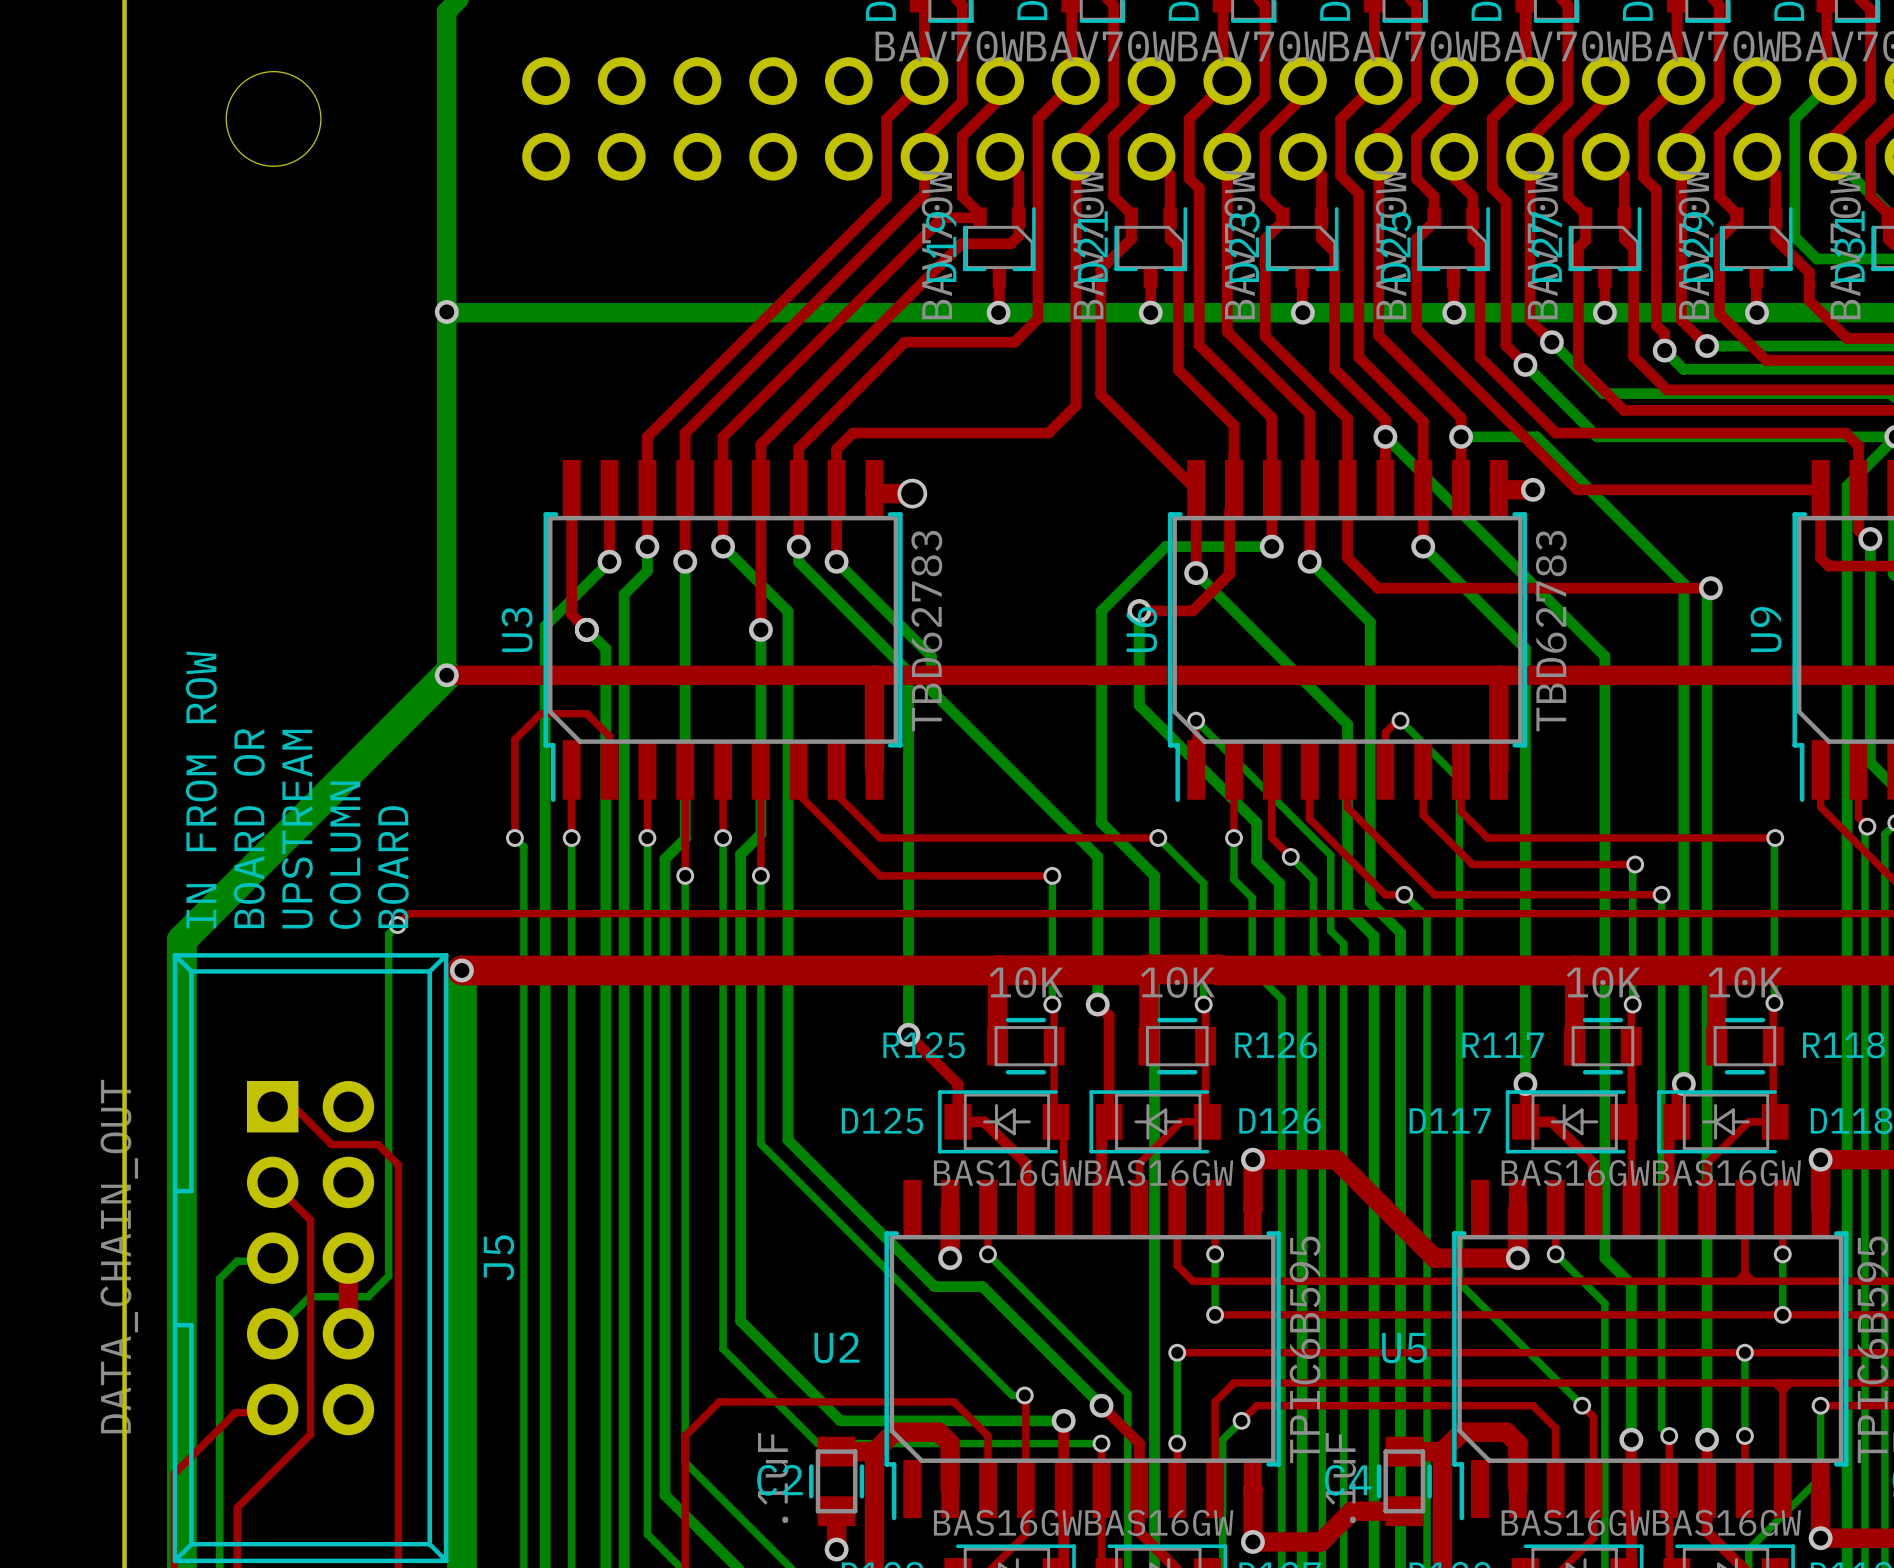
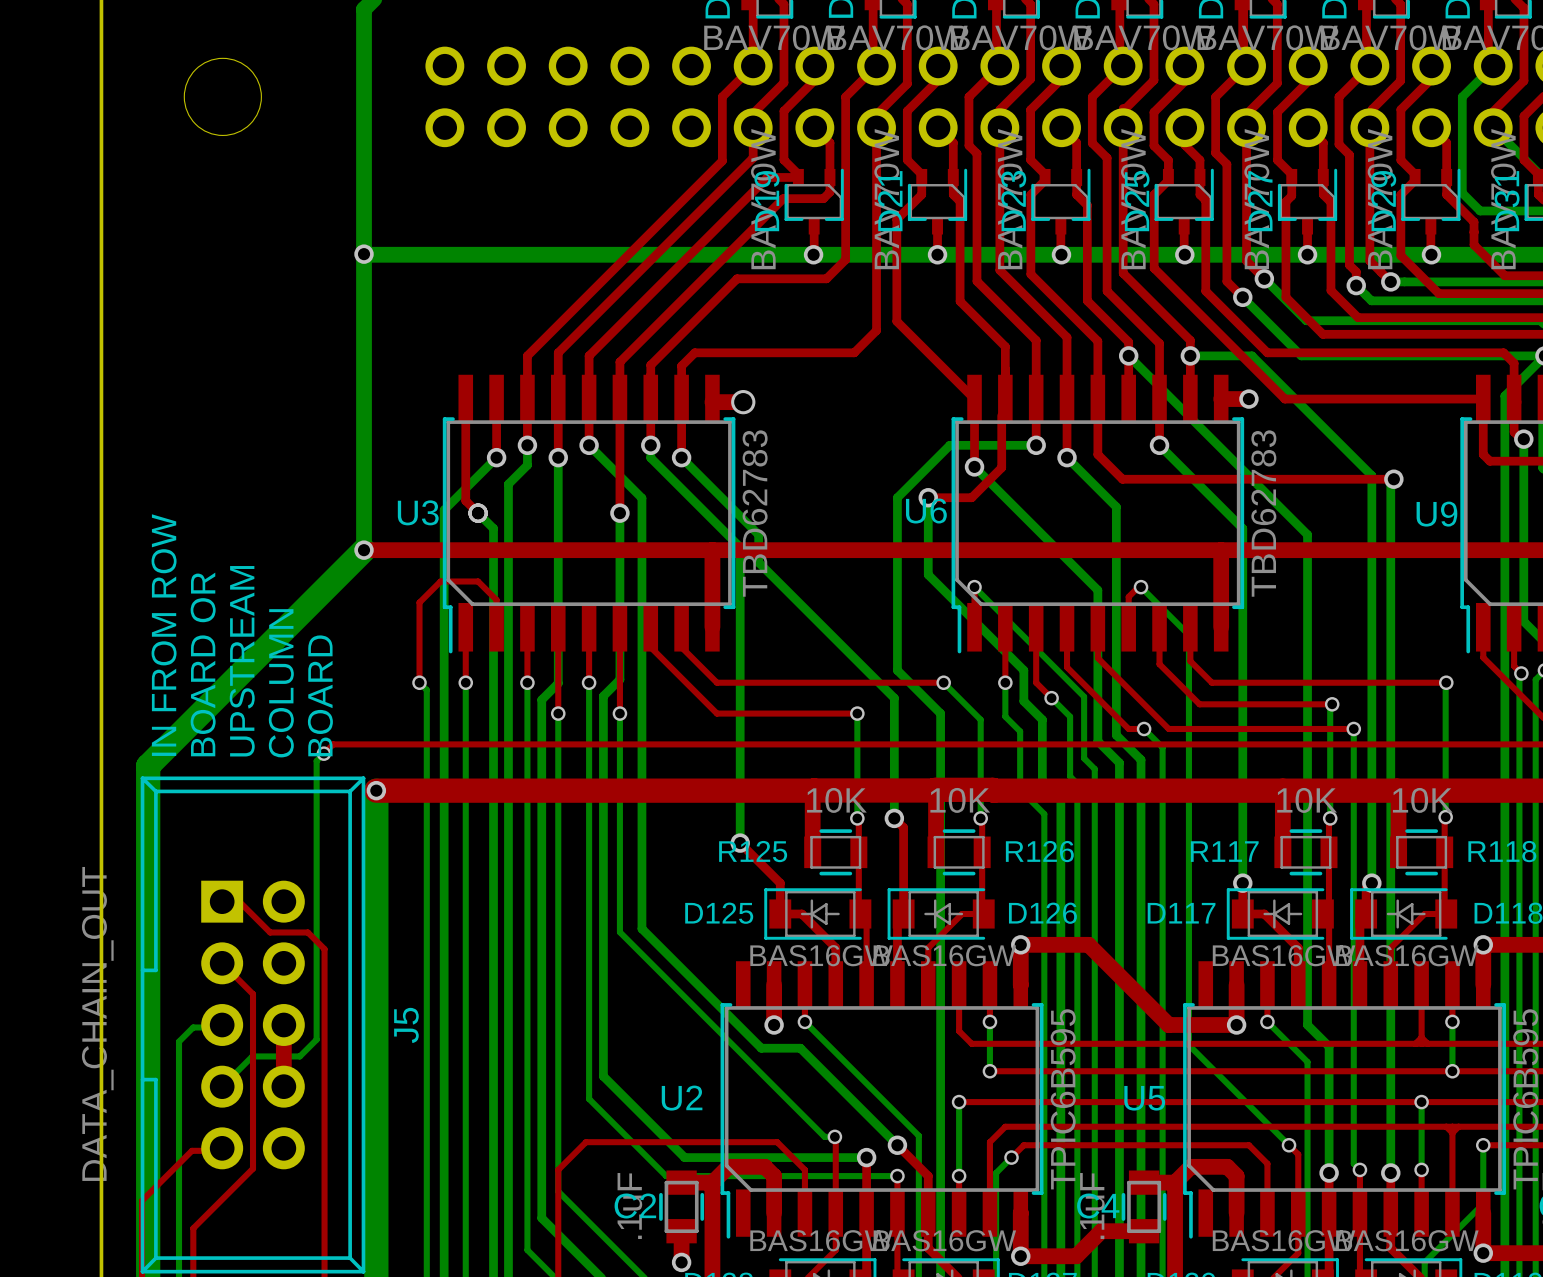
U3 name rotation: 0° (517, 629) -> 90° clockwise (418, 512)
U6 name rotation: 0° (1141, 629) -> 90° clockwise (926, 511)
U9 name rotation: 0° (1766, 629) -> 90° clockwise (1436, 514)

